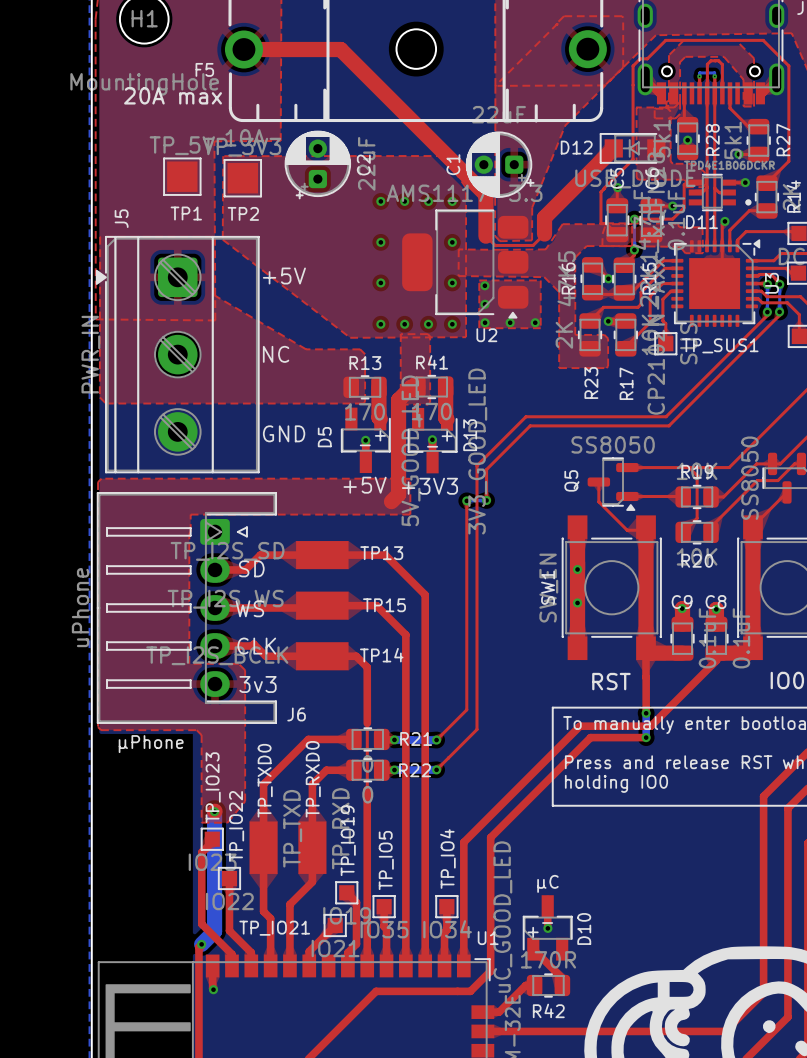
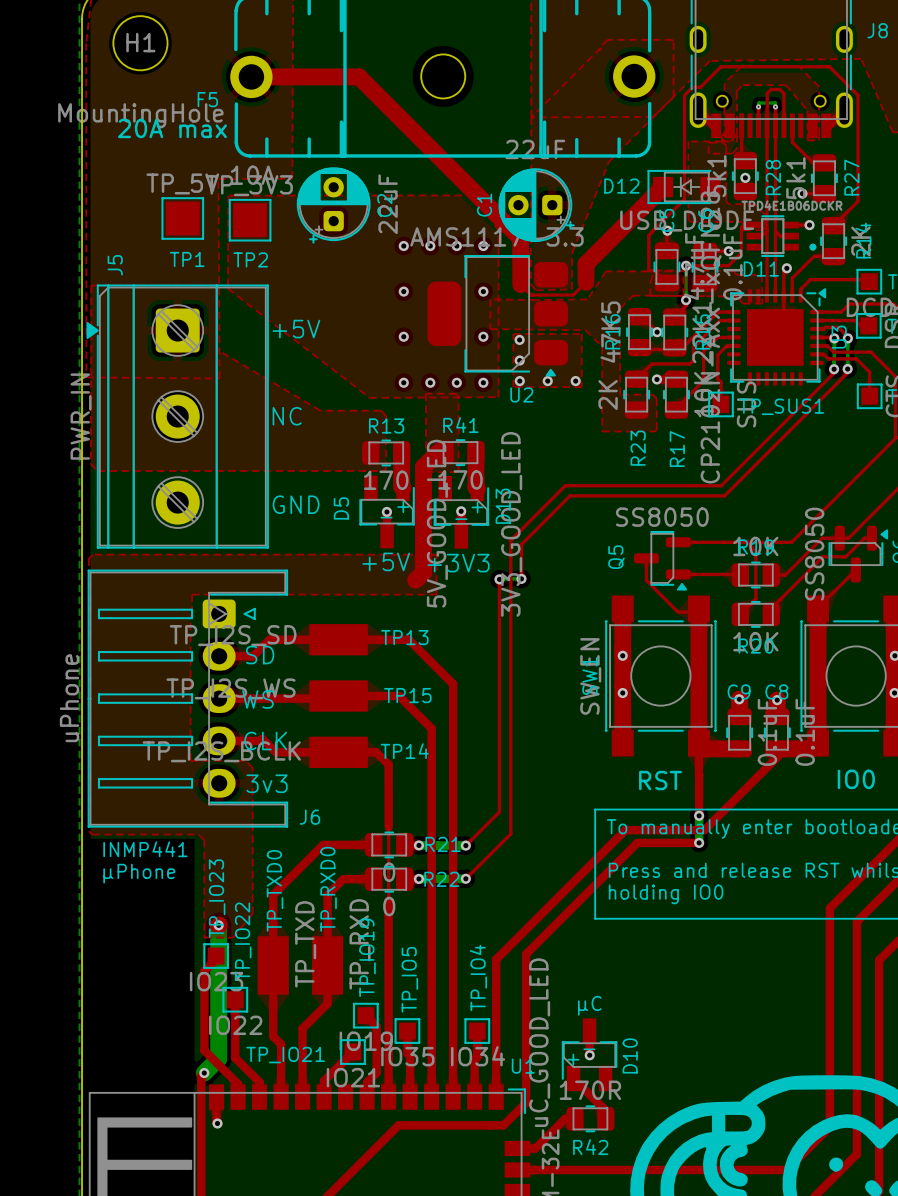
text: μPhone (151, 744) -> INMP441 (145, 849)
text: none -> μPhone (139, 873)

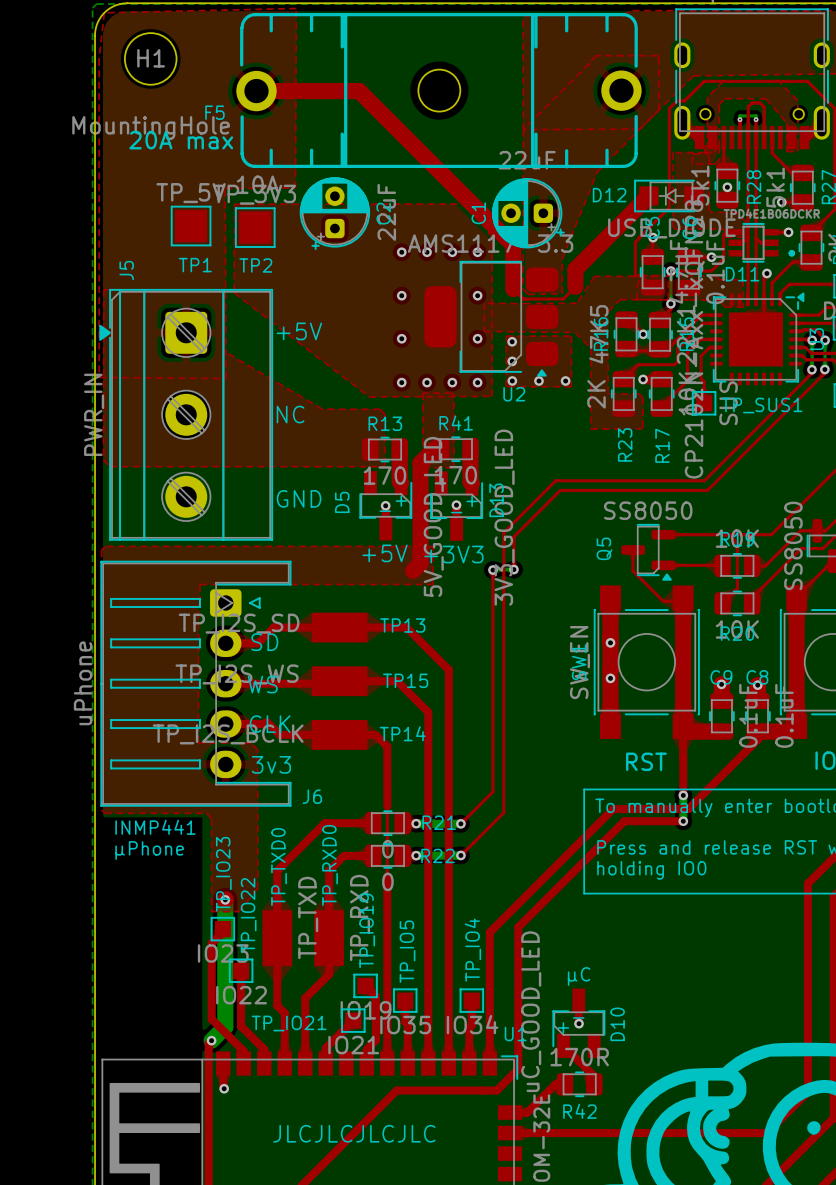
text: none -> JLCJLCJLCJLC (354, 1133)

